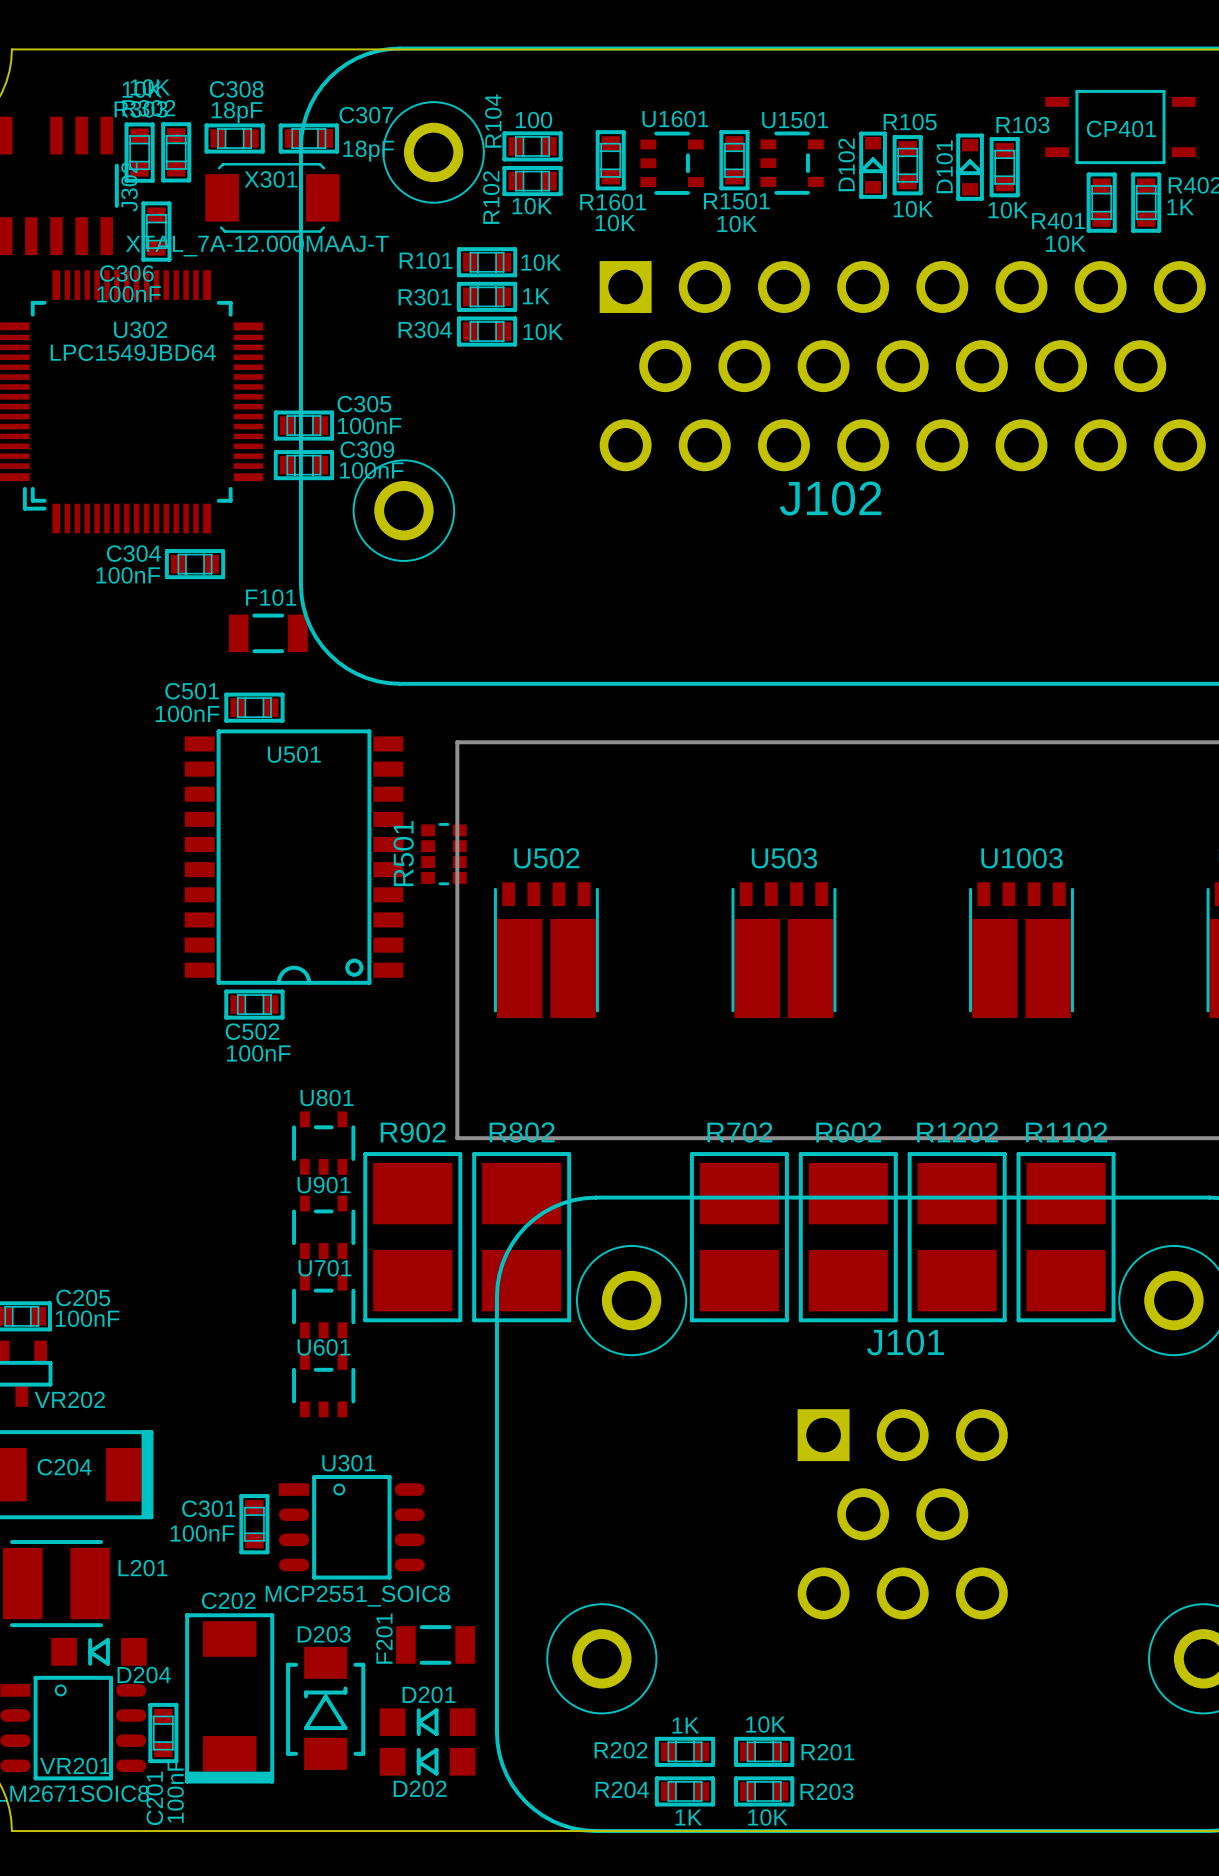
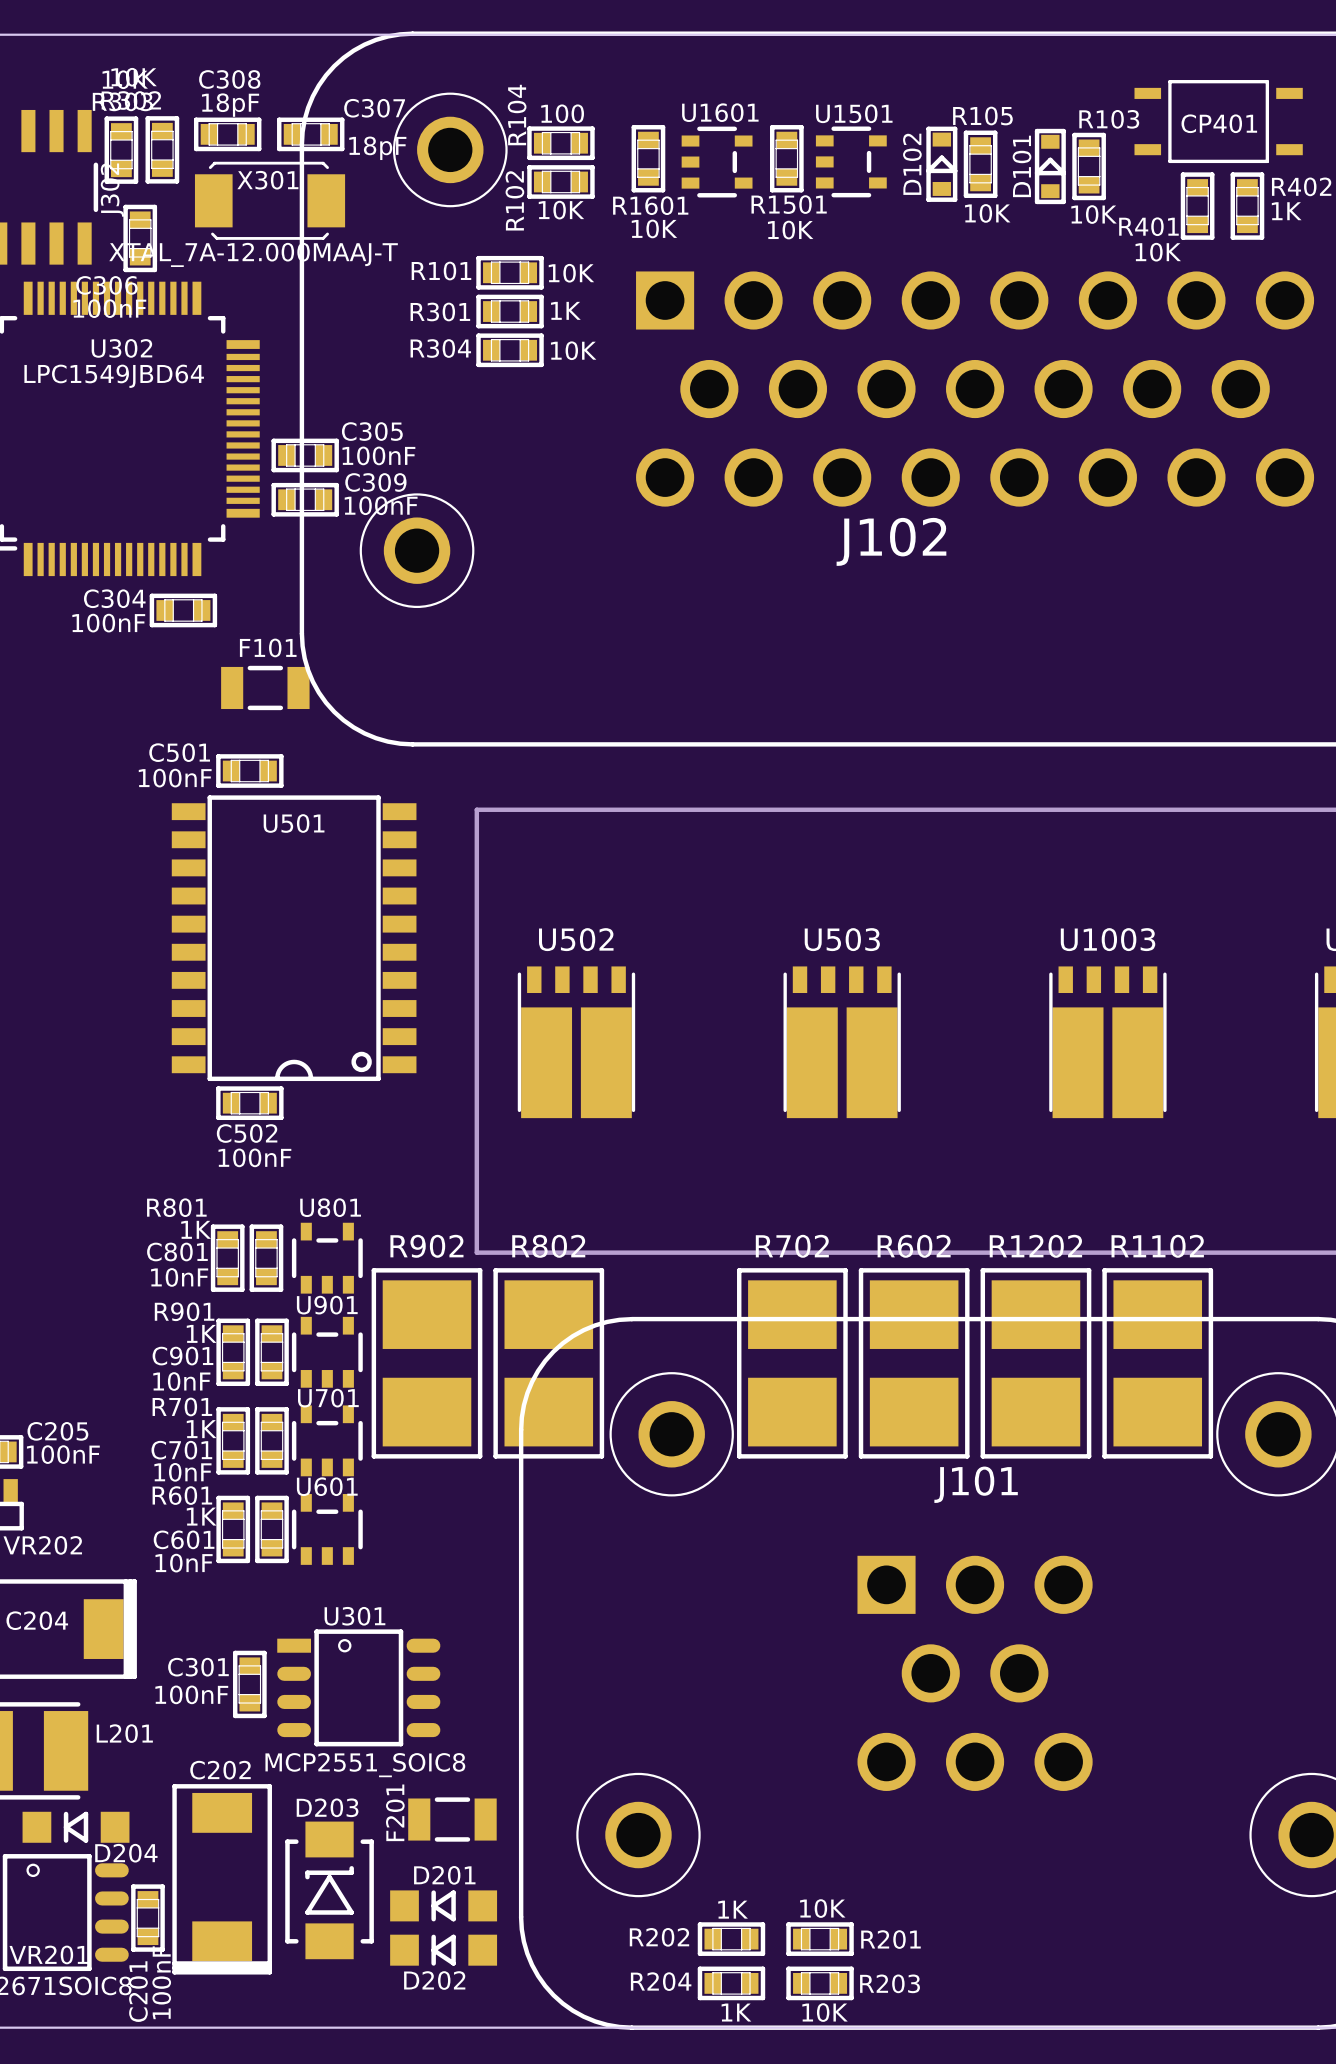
R501: (443, 854) -> none
C801: none -> 10nF (227, 1258)
R801: none -> 1K (266, 1258)
C901: none -> 10nF (233, 1352)
R901: none -> 1K (271, 1352)
C701: none -> 10nF (233, 1440)
R701: none -> 1K (271, 1440)
C601: none -> 10nF (233, 1529)
R601: none -> 1K (271, 1529)

